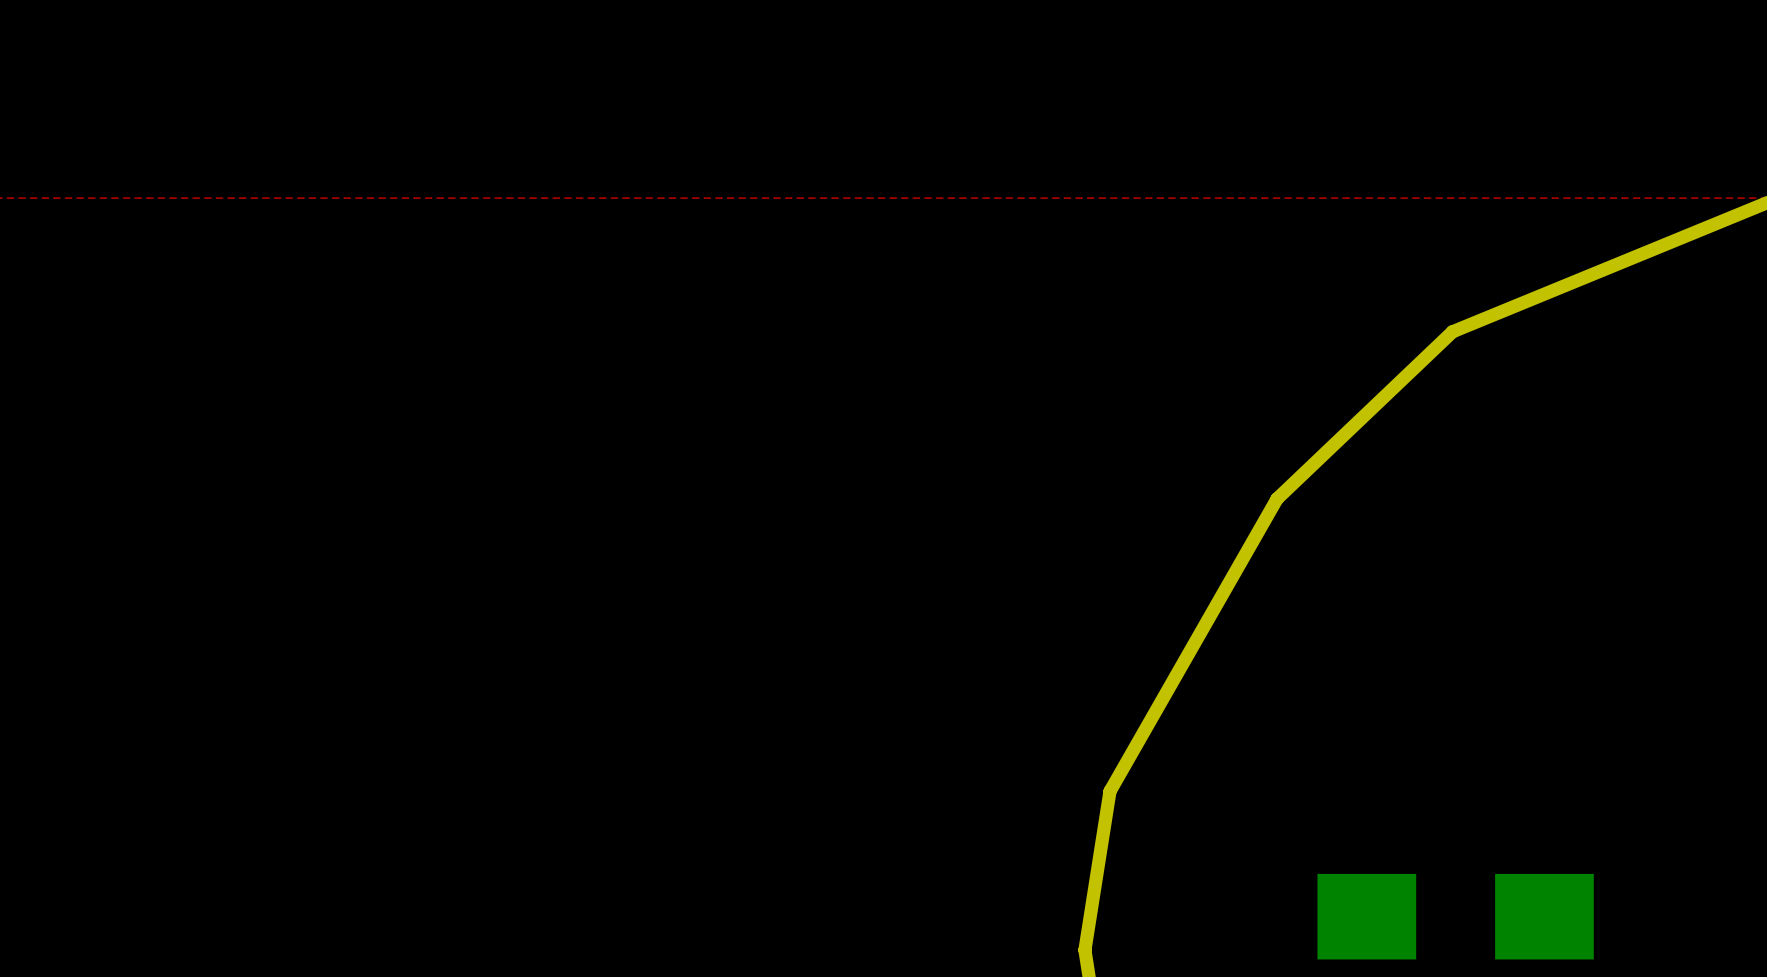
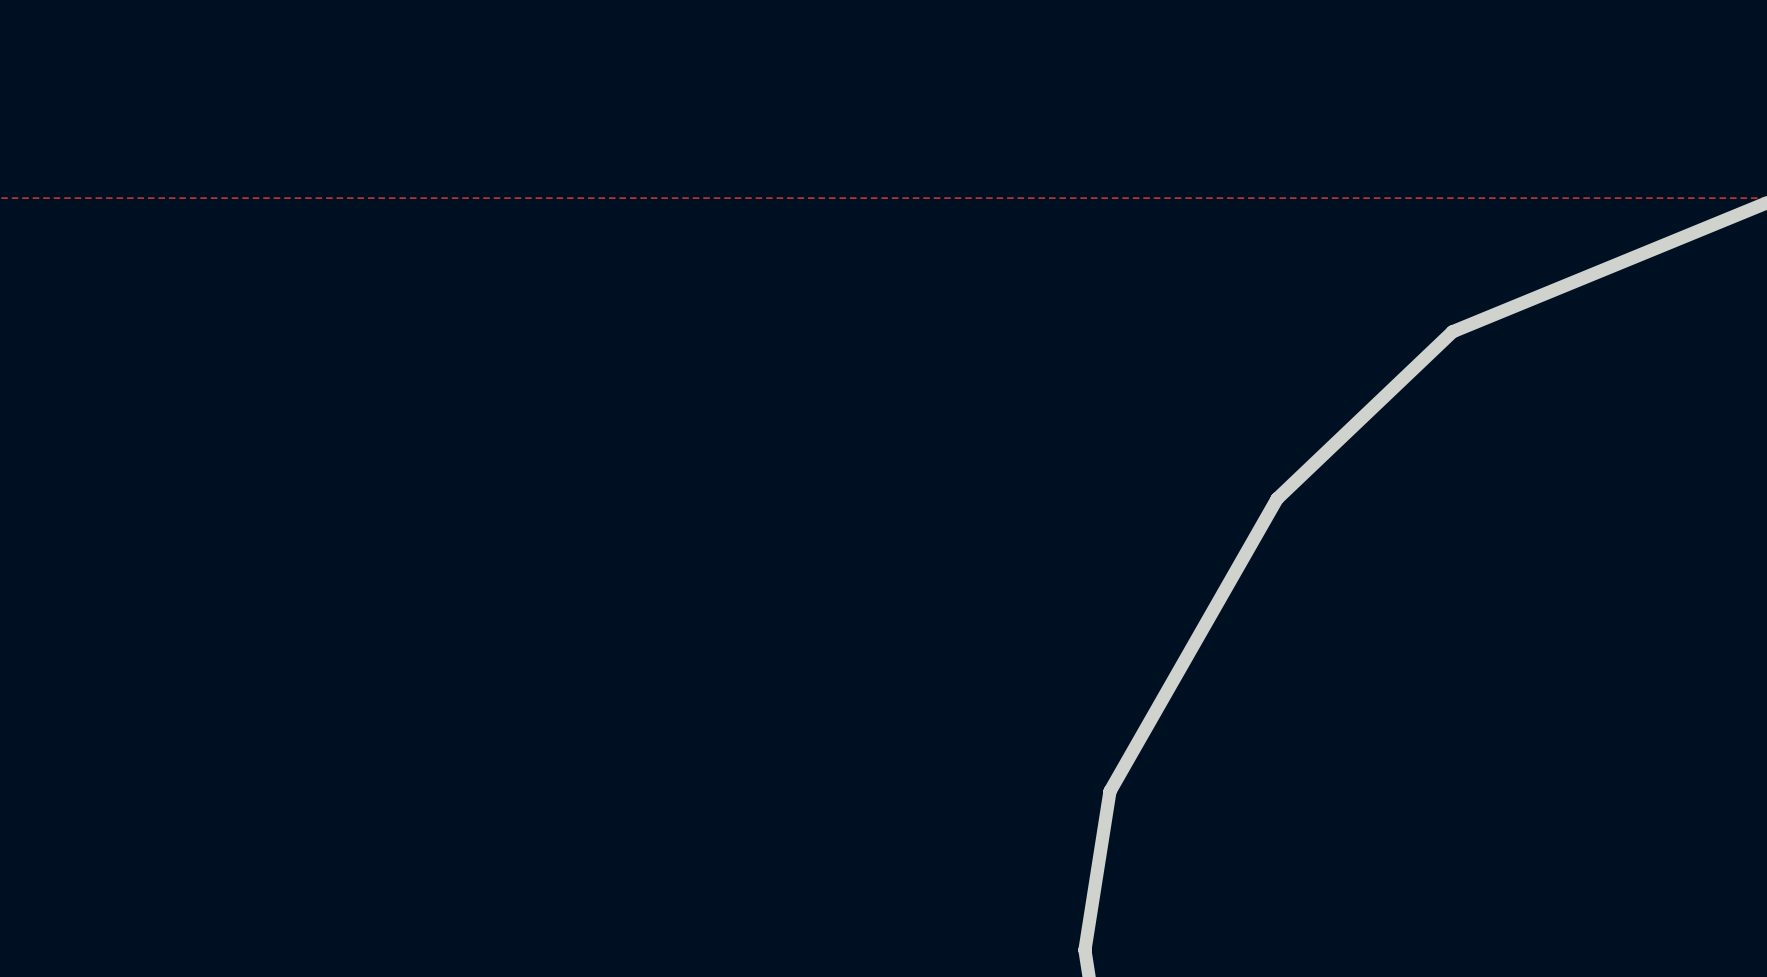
part: (1455, 916) -> none

